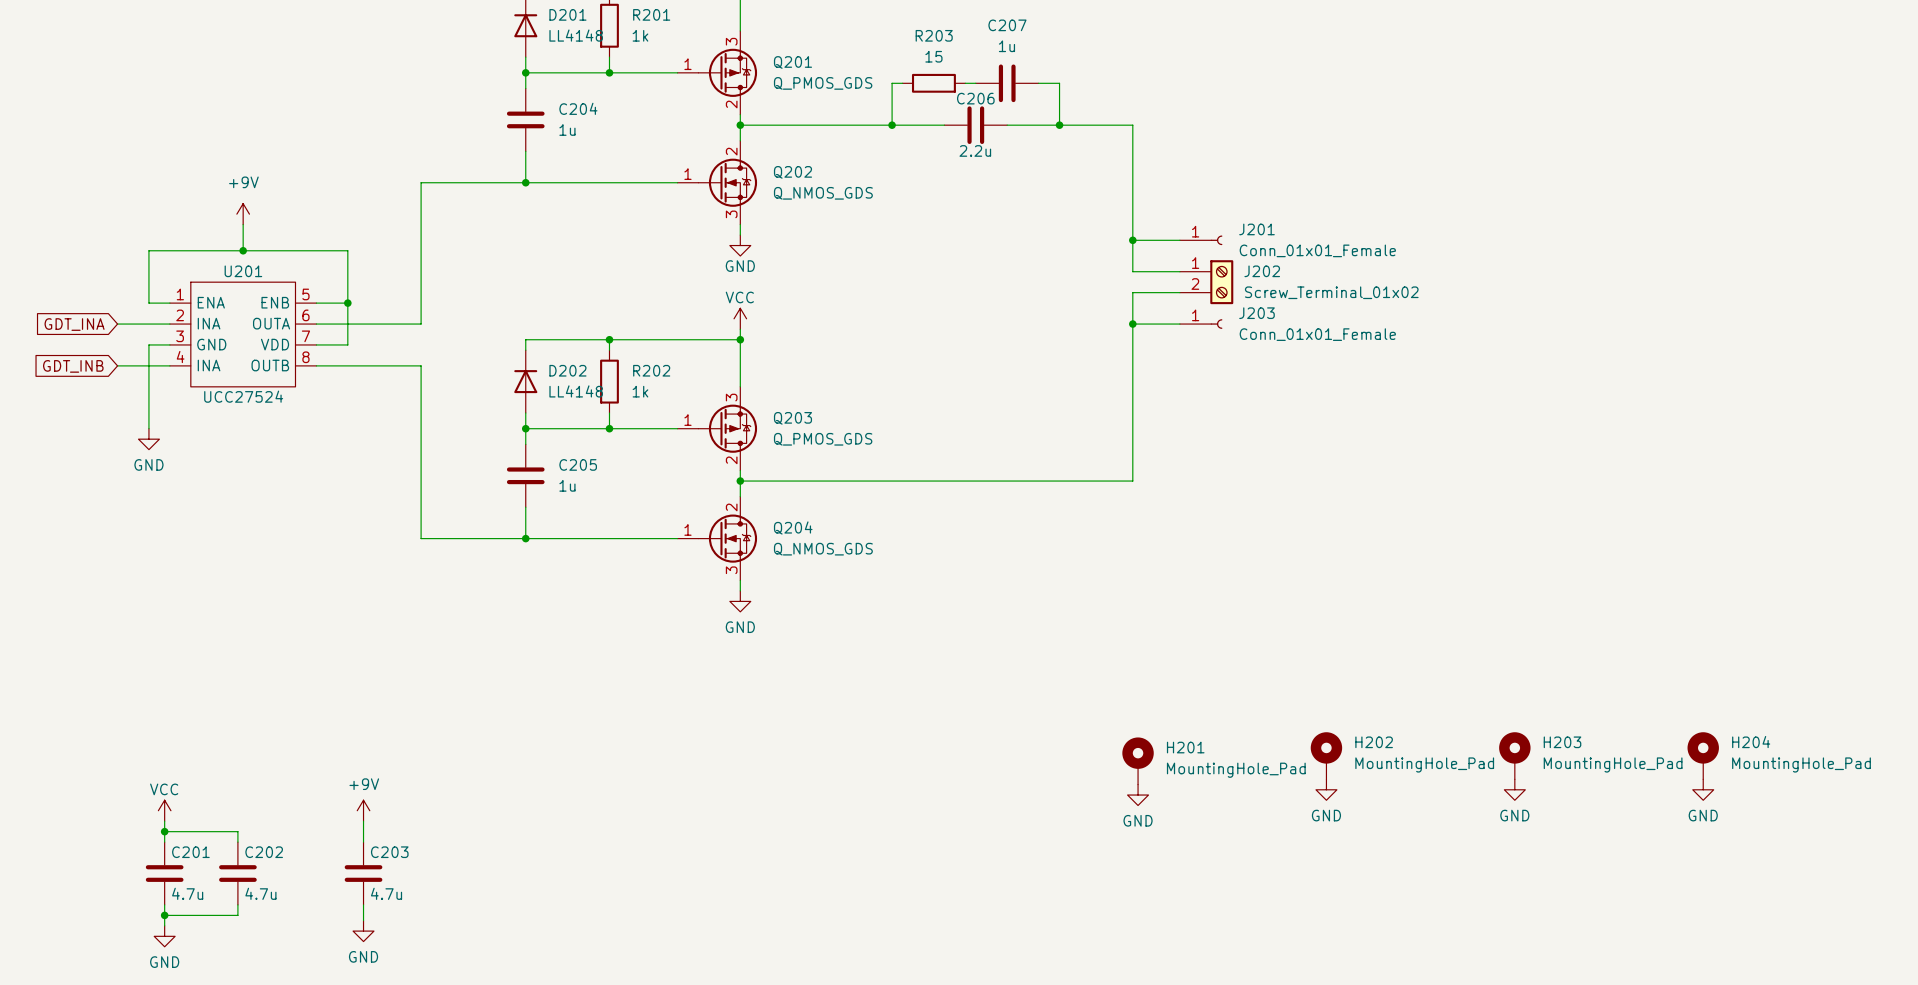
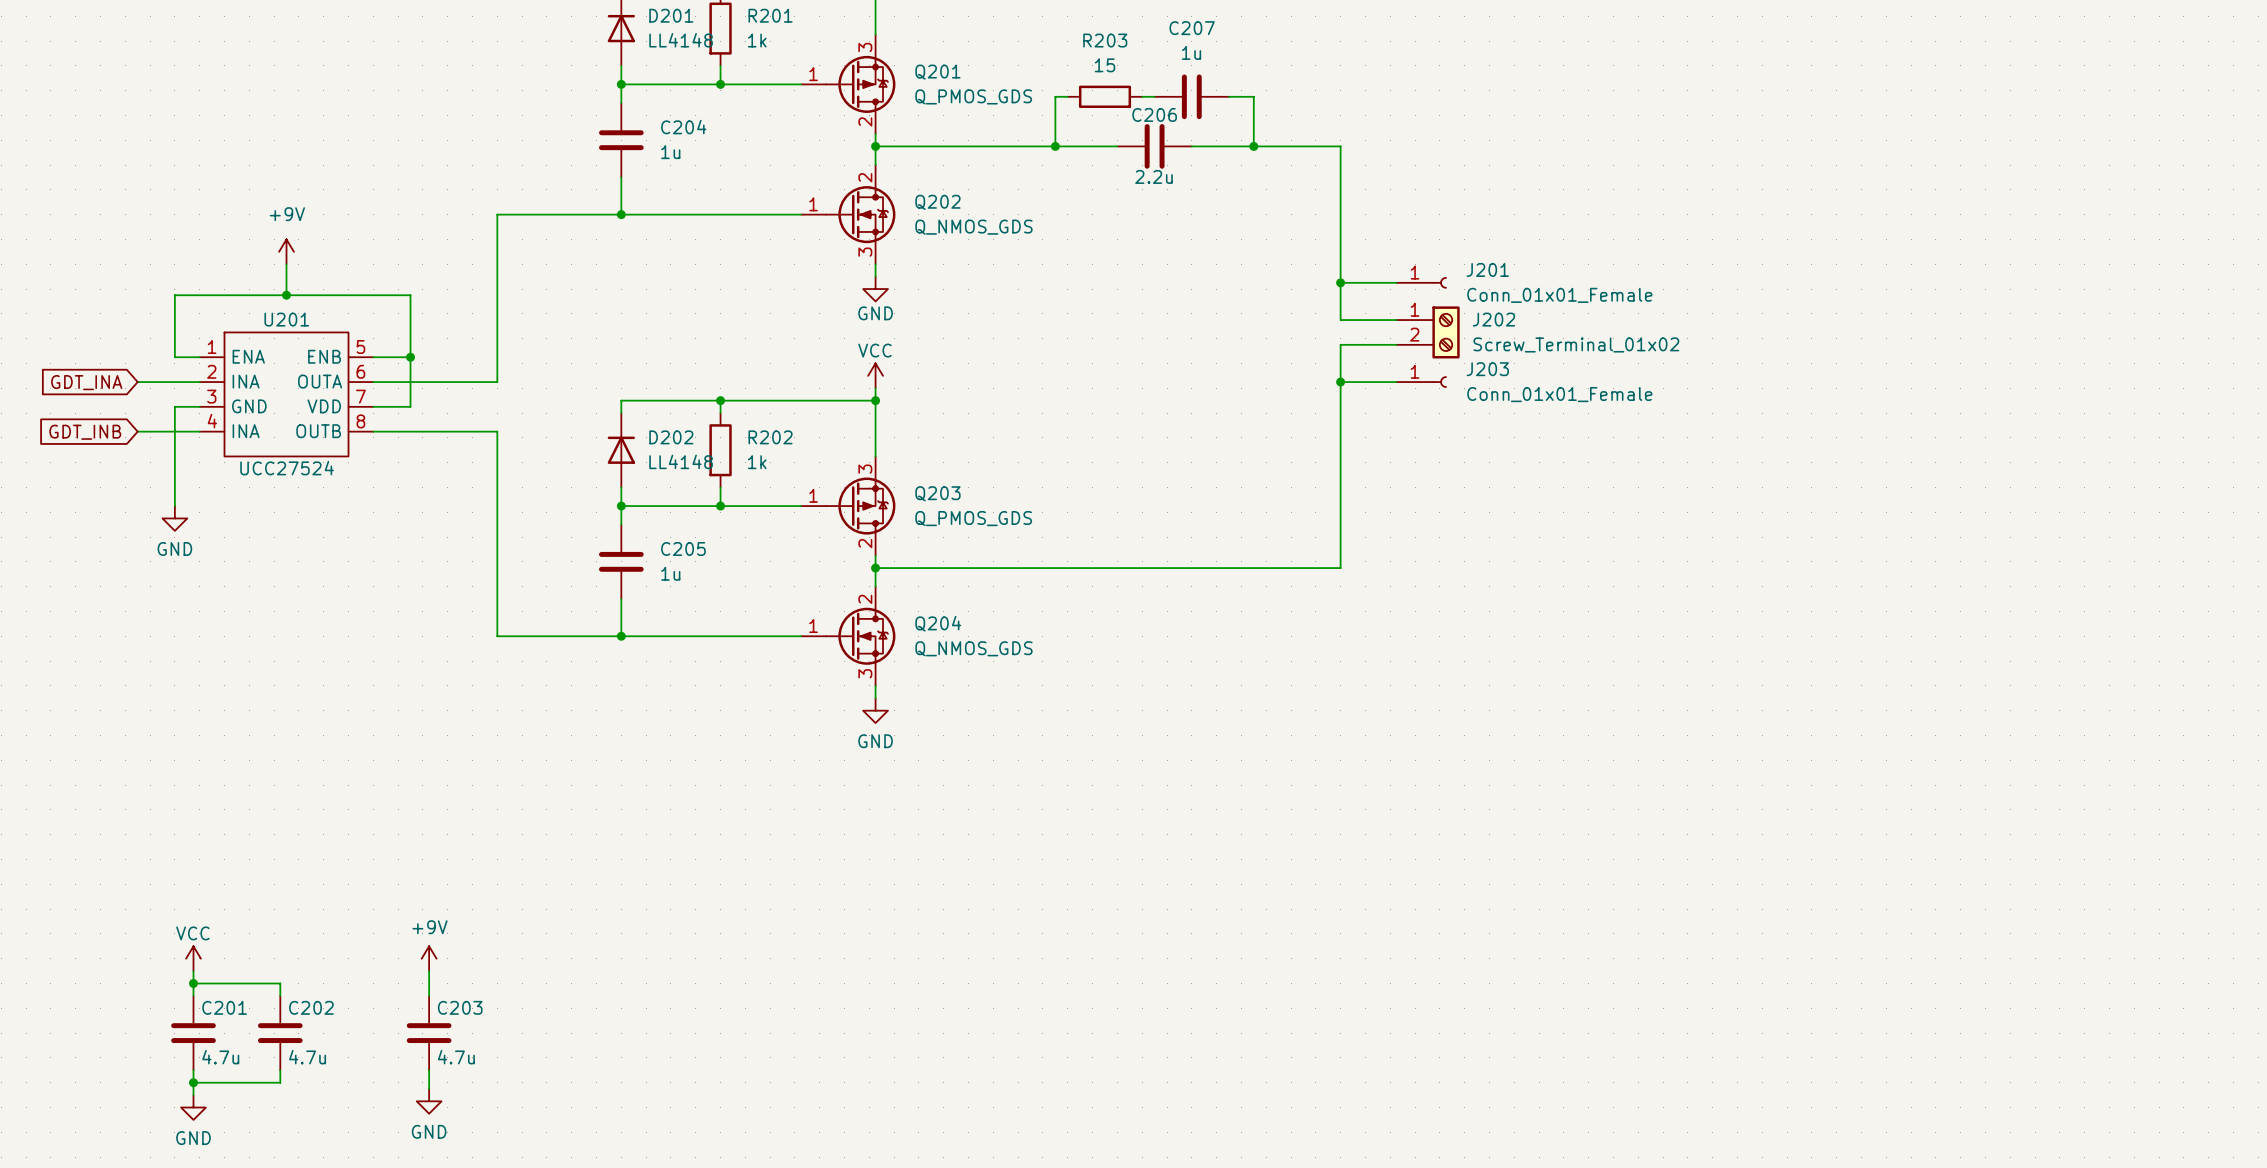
H202: MountingHole_Pad (1326, 755) -> none
H203: MountingHole_Pad (1514, 755) -> none
H204: MountingHole_Pad (1703, 755) -> none
H201: MountingHole_Pad (1138, 761) -> none
power symbol: GND (1326, 789) -> none
power symbol: GND (1514, 789) -> none
power symbol: GND (1703, 789) -> none
power symbol: GND (1138, 795) -> none

